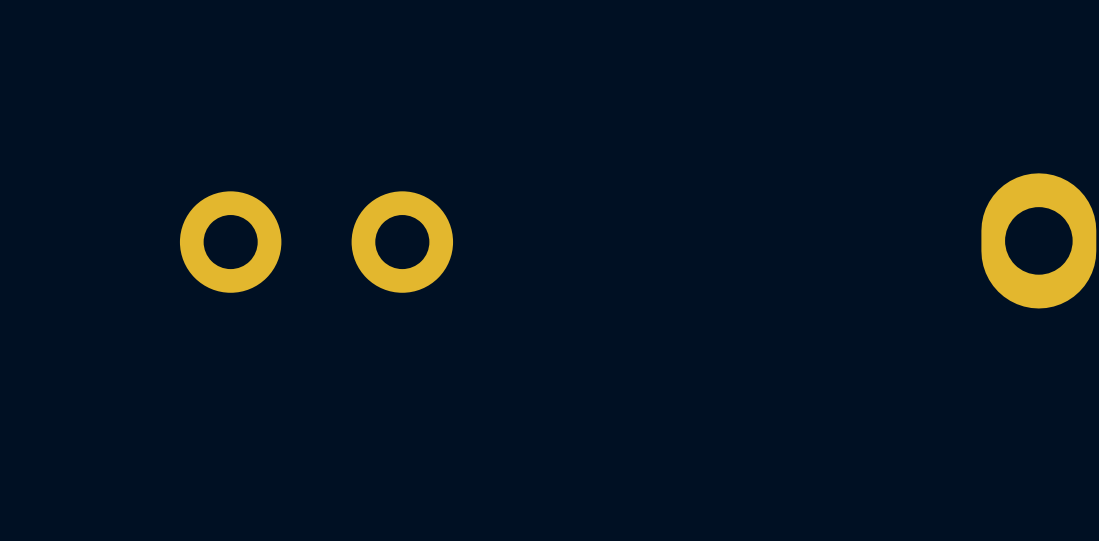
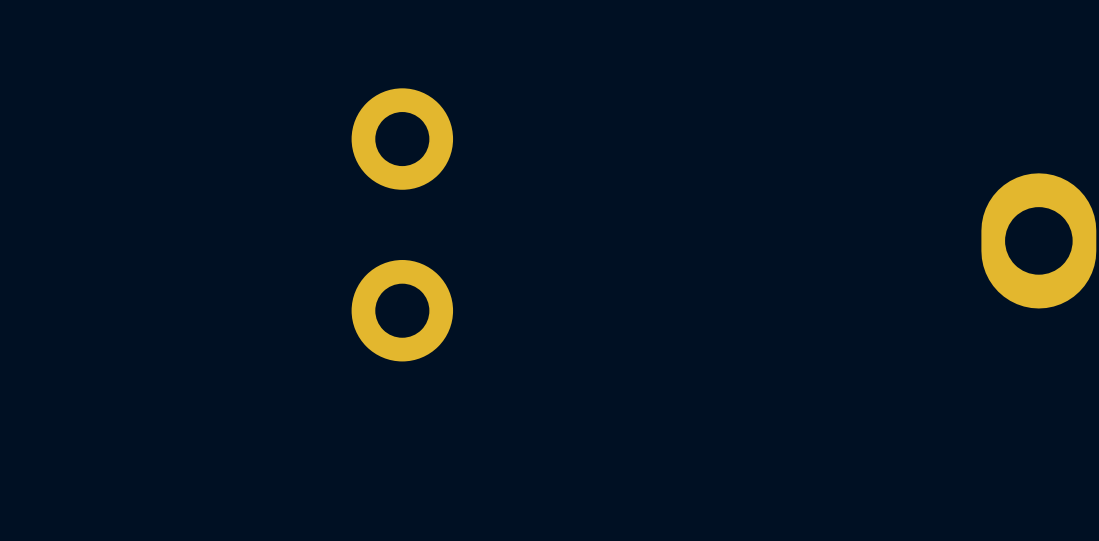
part rotation: 0° (316, 242) -> 90° clockwise (402, 224)

